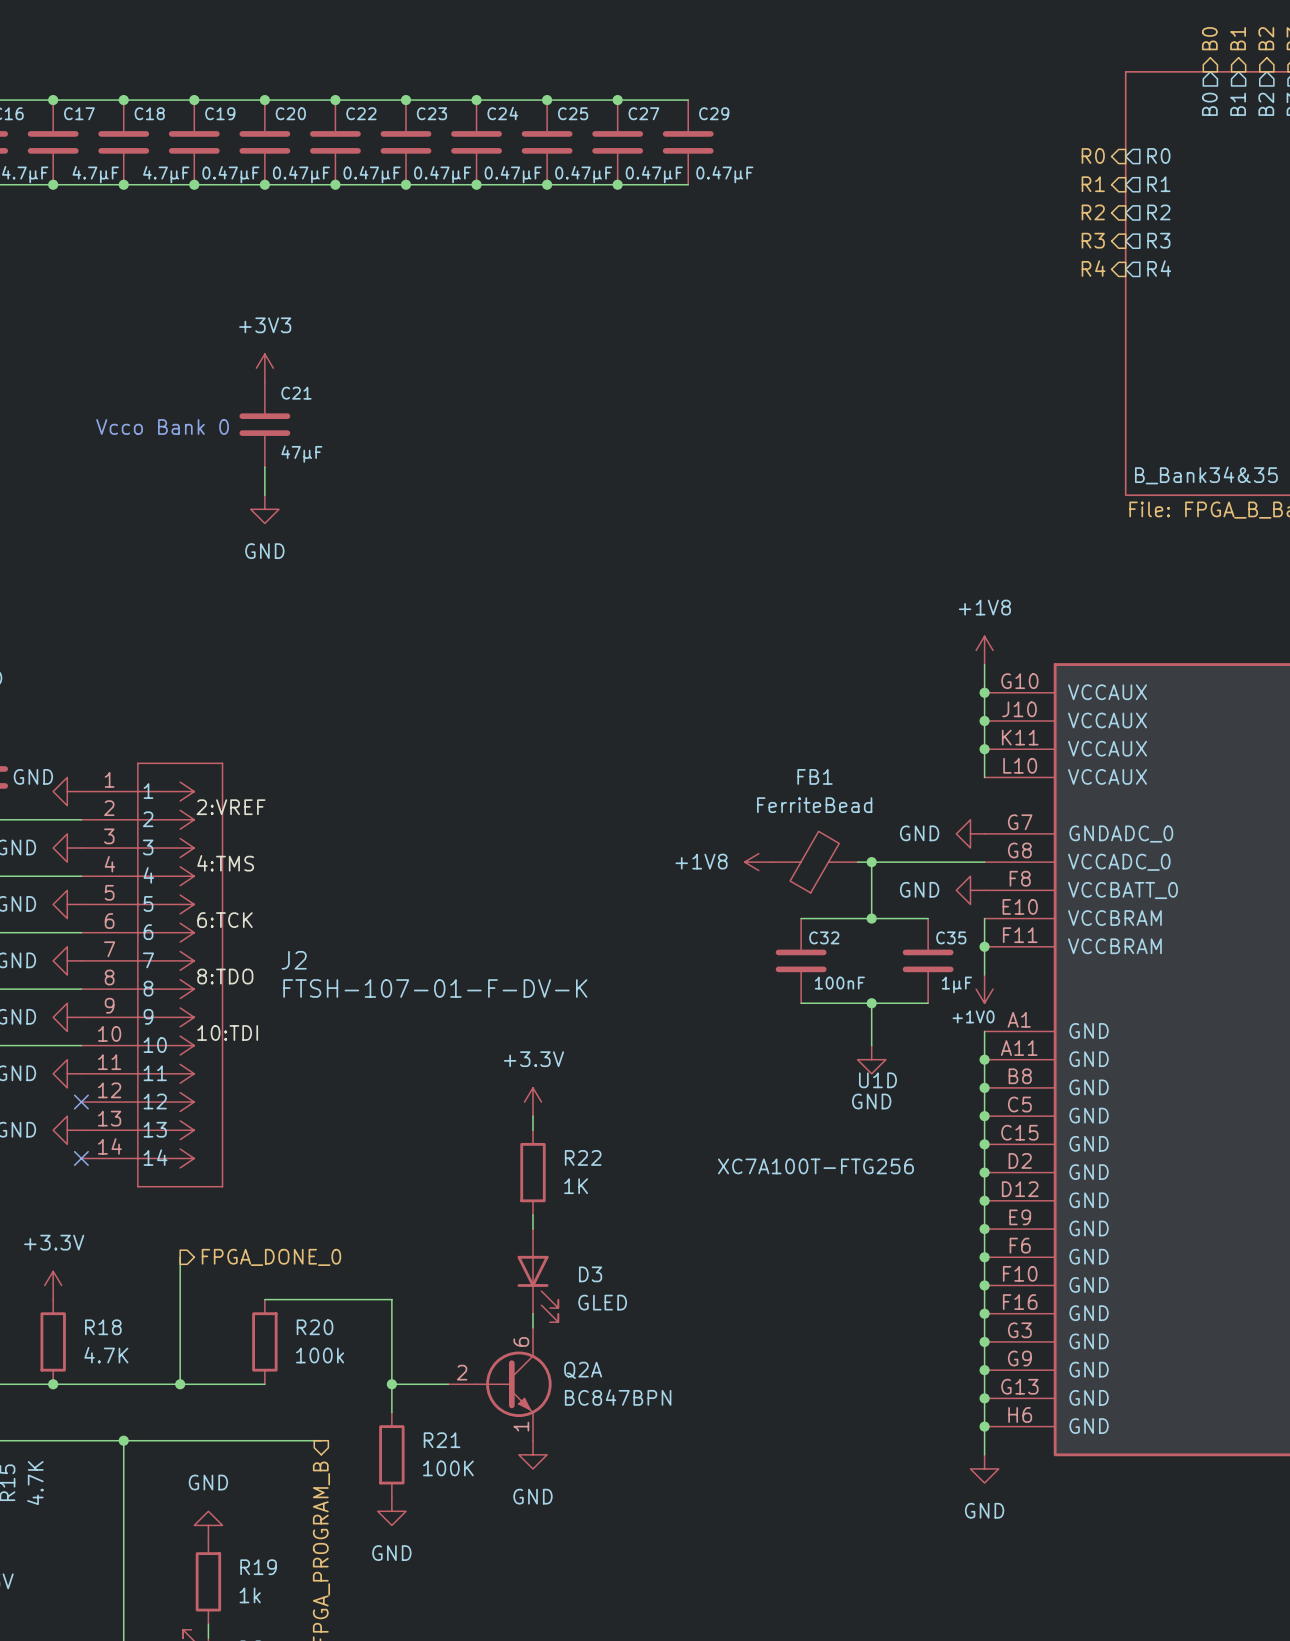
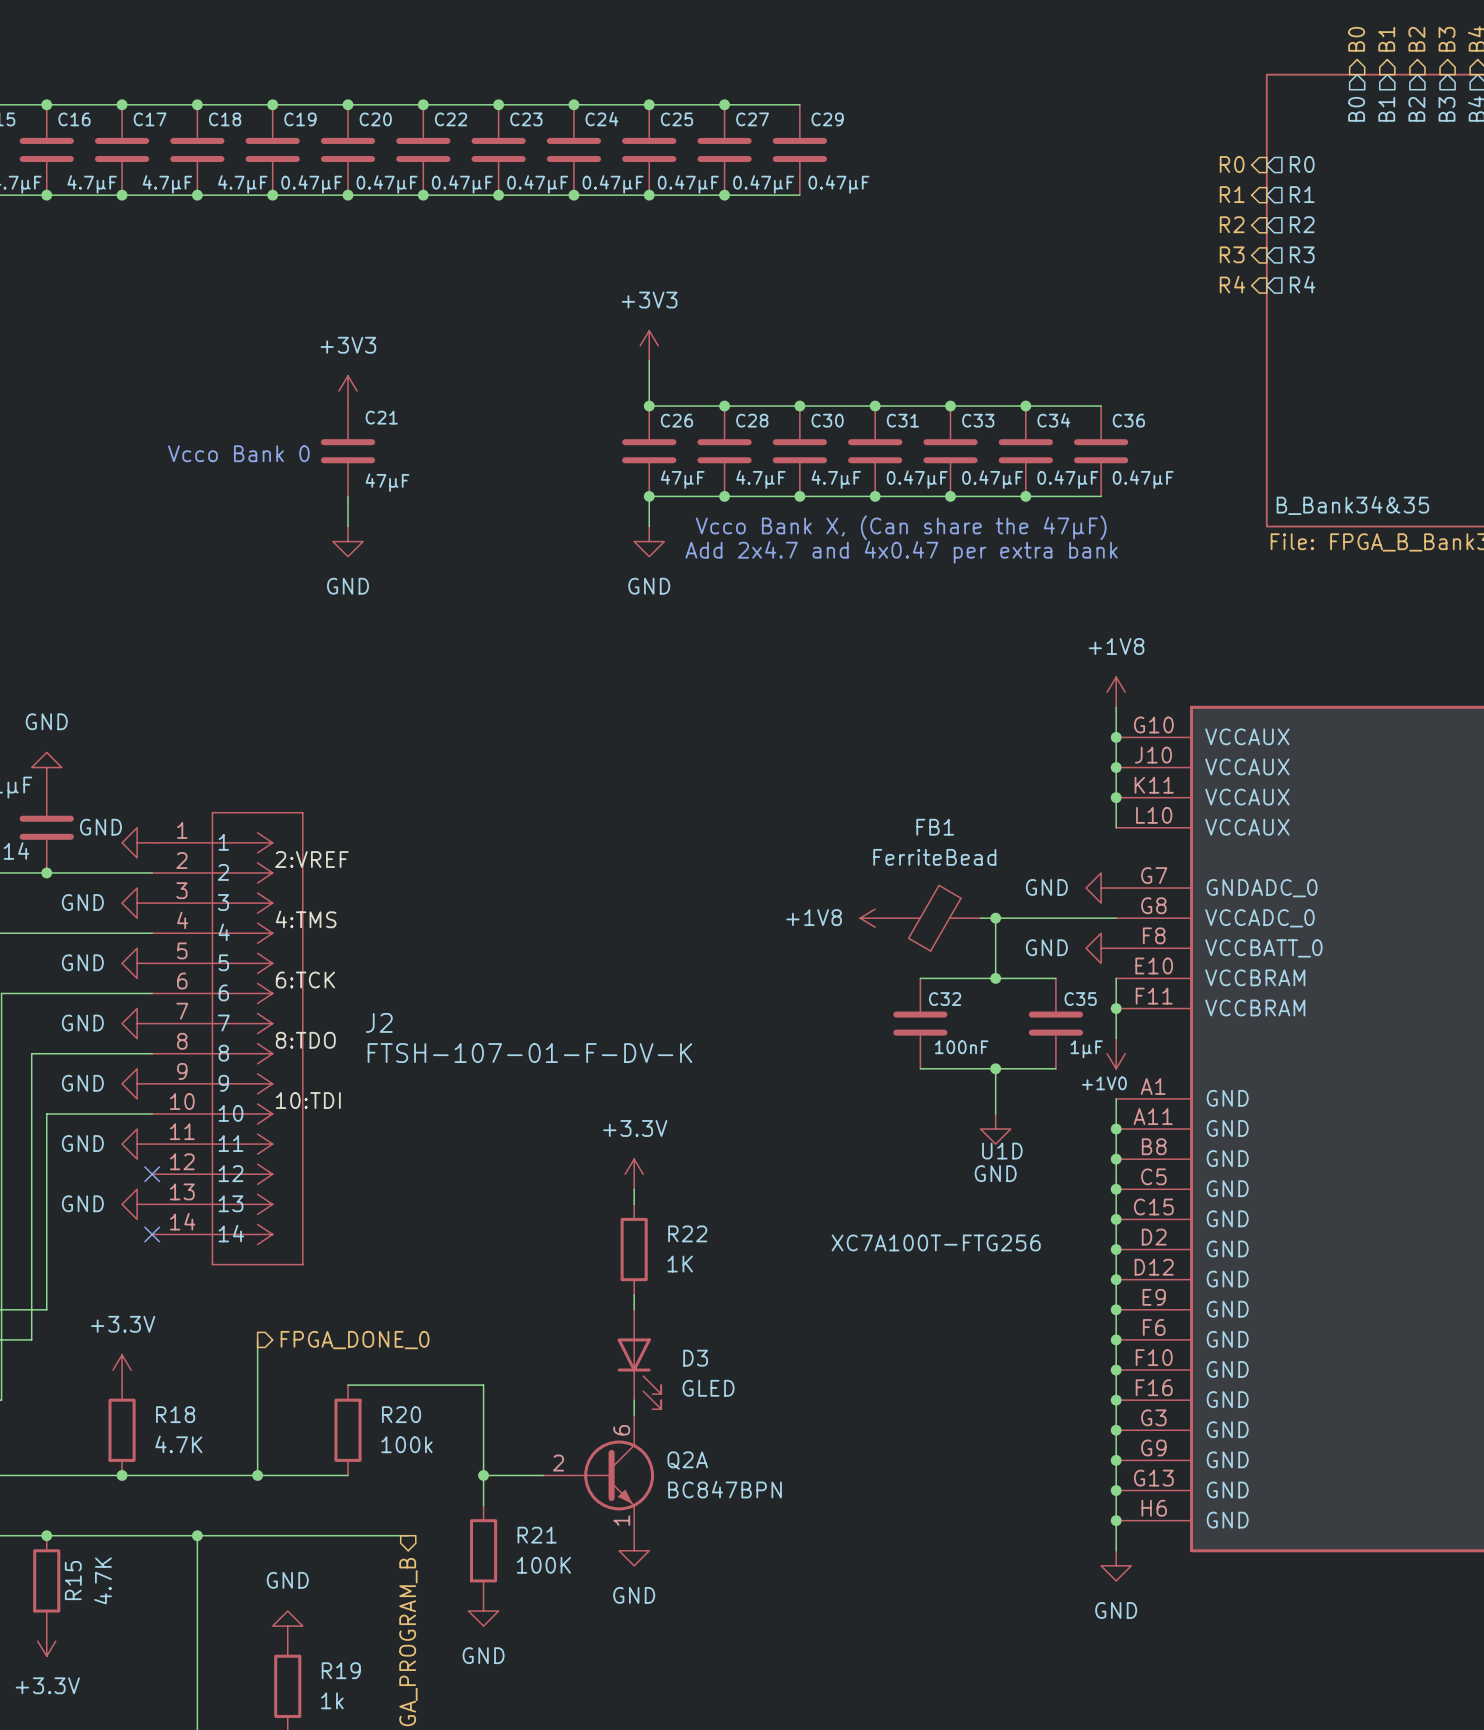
power symbol: none -> +3V3 (649, 345)
wire: none -> (649, 360) (649, 406) (1101, 406)
junction: none -> (649, 406)
junction: none -> (724, 406)
junction: none -> (799, 406)
junction: none -> (875, 406)
junction: none -> (950, 406)
junction: none -> (1025, 406)
C26: none -> 47µF (649, 451)
C28: none -> 4.7µF (724, 451)
C30: none -> 4.7µF (799, 451)
C31: none -> 0.47µF (875, 451)
C33: none -> 0.47µF (950, 451)
C34: none -> 0.47µF (1025, 451)
C36: none -> 0.47µF (1101, 451)
junction: none -> (649, 496)
junction: none -> (724, 496)
junction: none -> (799, 496)
junction: none -> (875, 496)
junction: none -> (950, 496)
junction: none -> (1025, 496)
wire: none -> (1101, 496) (649, 496) (649, 526)
text: none -> Vcco Bank X, (Can share the 47µF) (901, 527)
power symbol: none -> GND (649, 541)
text: none -> Add 2x4.7 and 4x0.47 per extra bank (901, 552)

